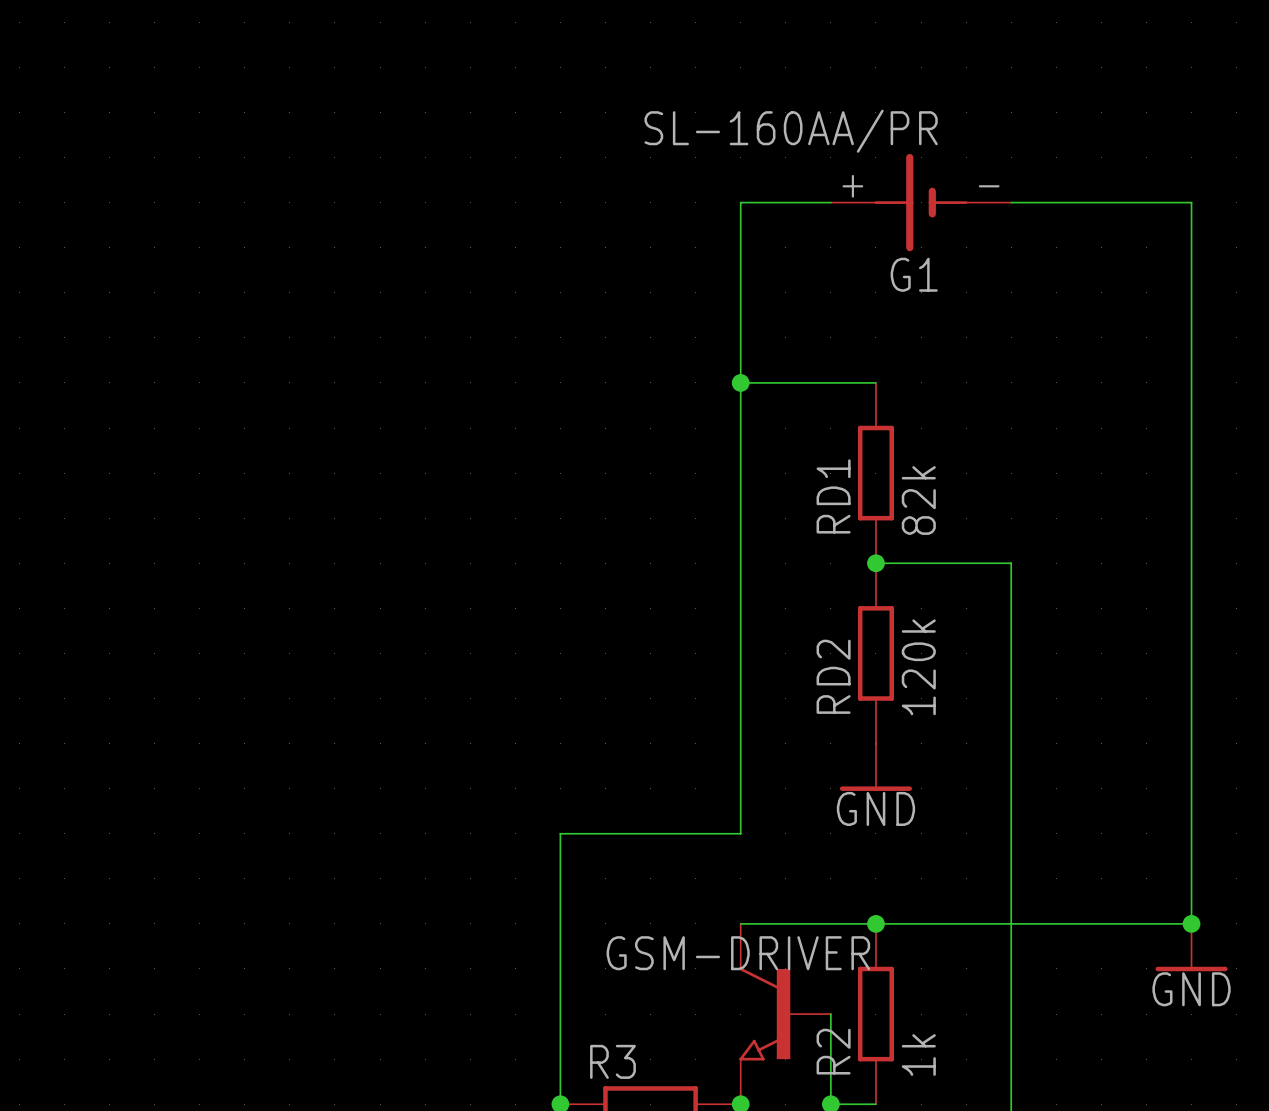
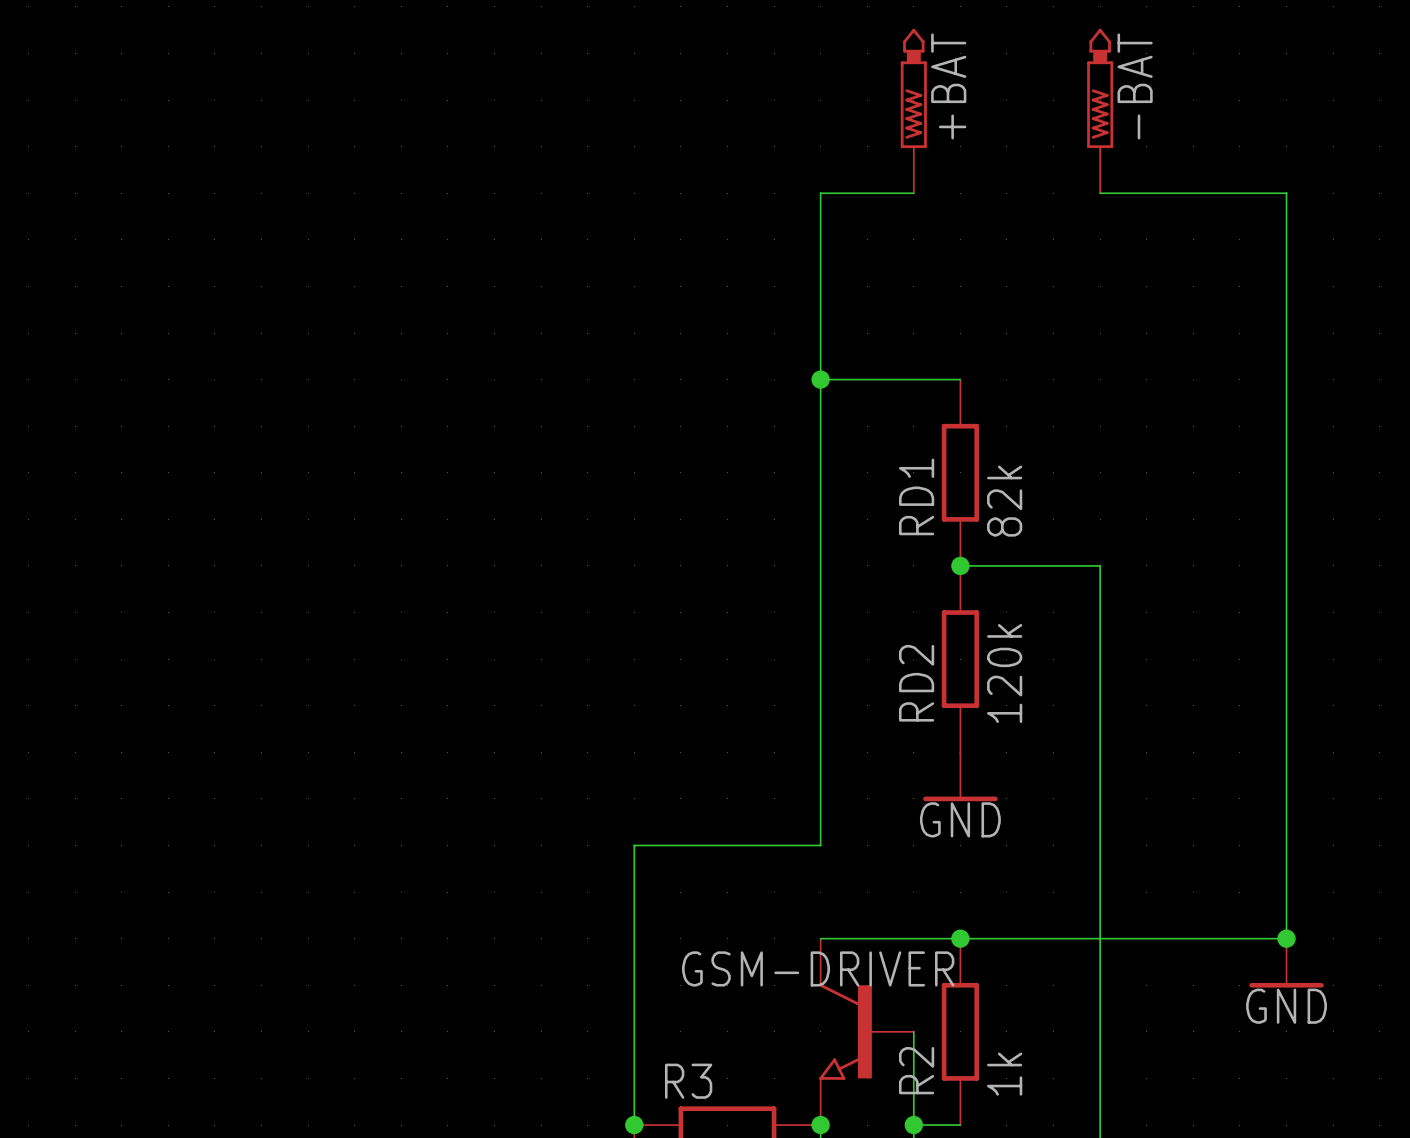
+BAT: none -> (913, 111)
-BAT: none -> (1100, 111)
G1: SL-160AA/PR (921, 202) -> none

